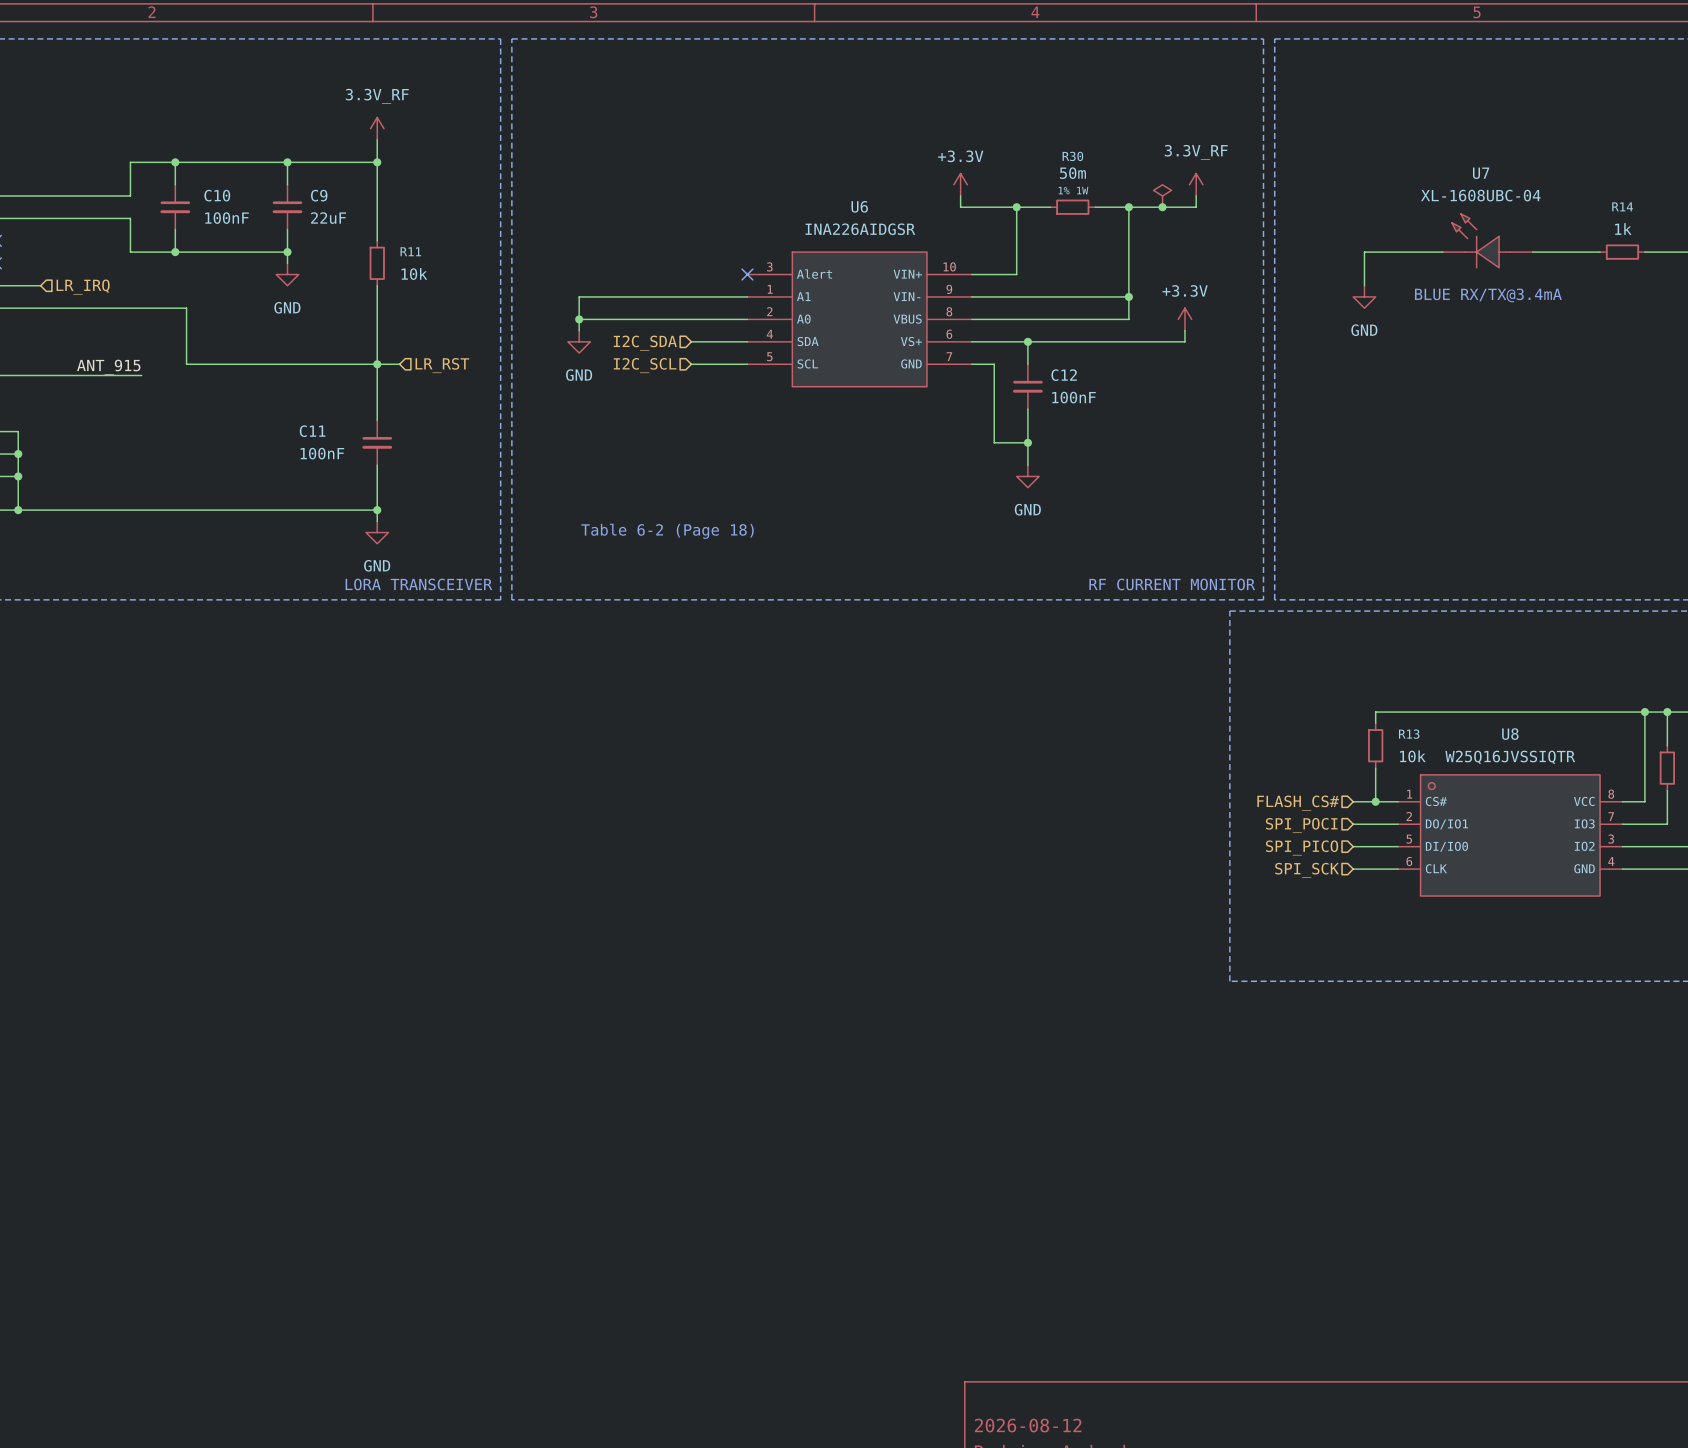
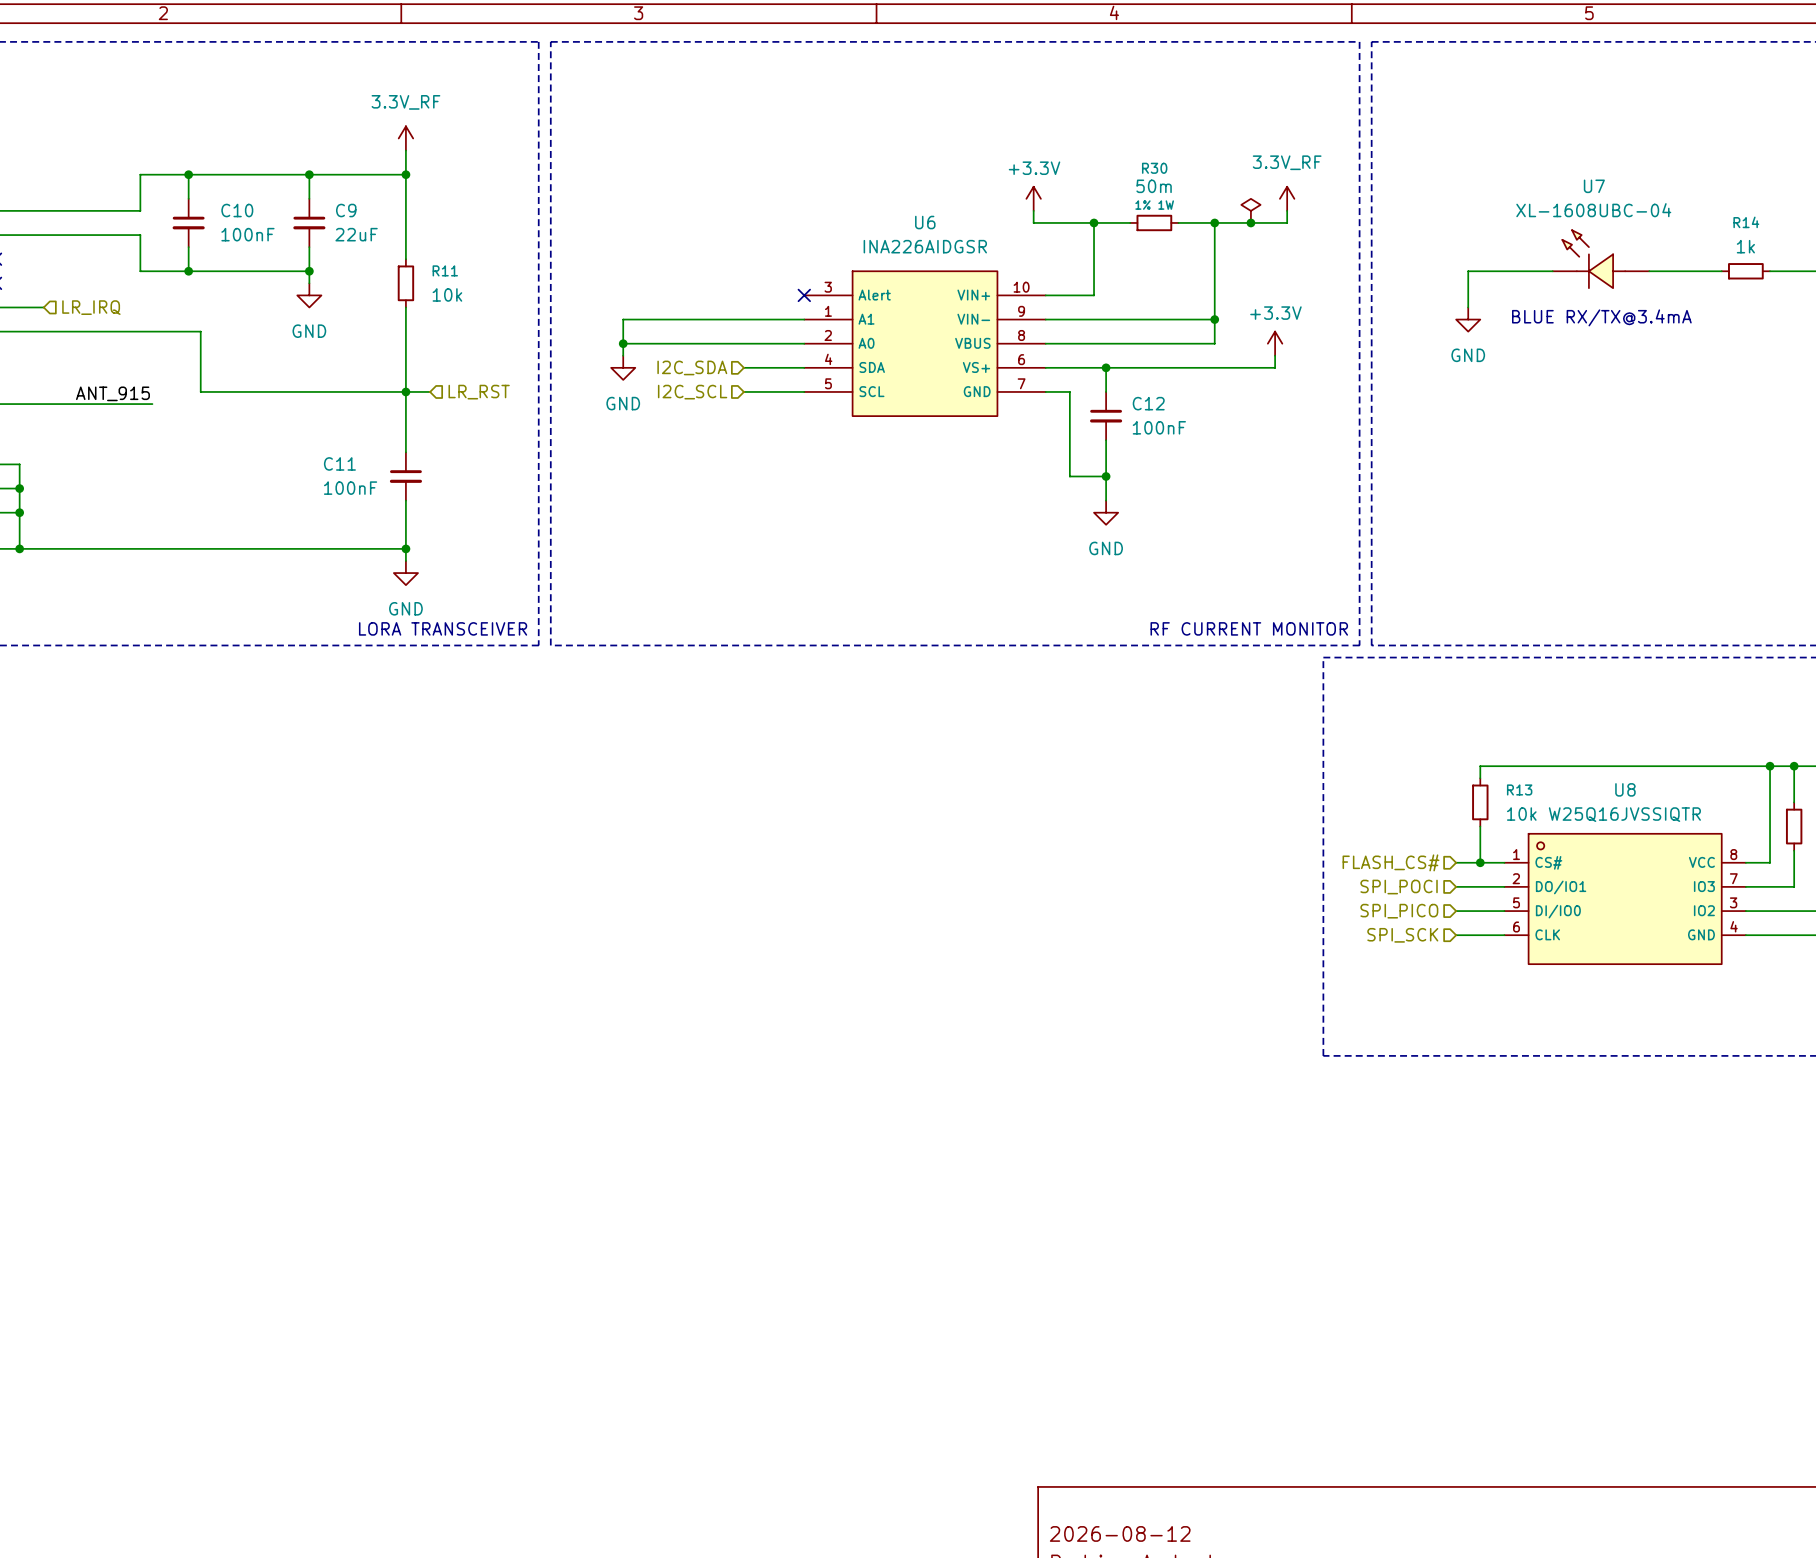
text: Table 6-2 (Page 18) (667, 531) -> none

